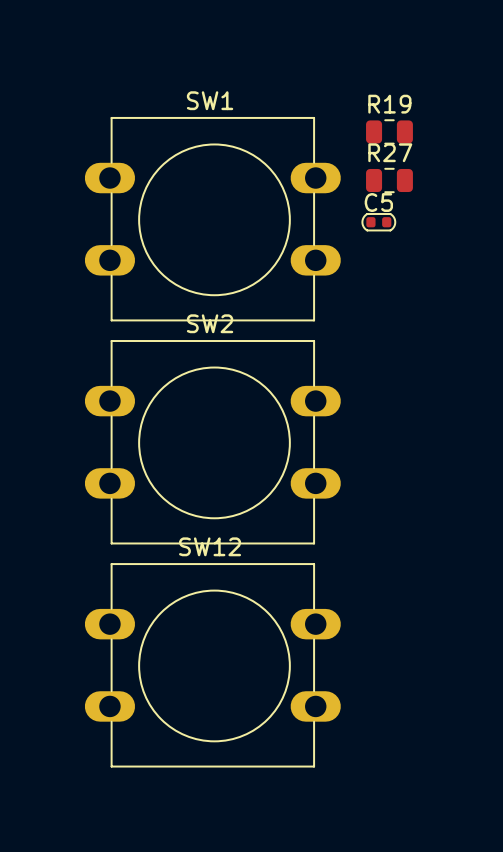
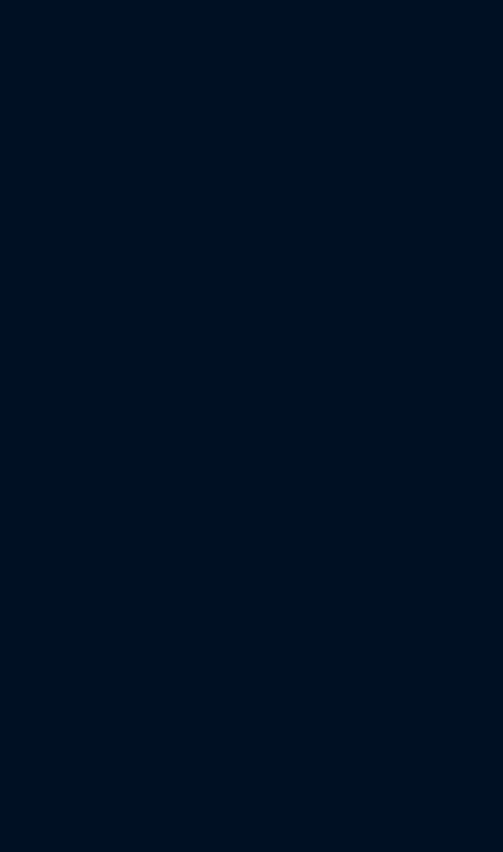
R19: (389, 131) -> none
R27: (389, 180) -> none
SW1: (212, 219) -> none
C5: (378, 222) -> none
SW2: (212, 442) -> none
SW12: (212, 665) -> none

